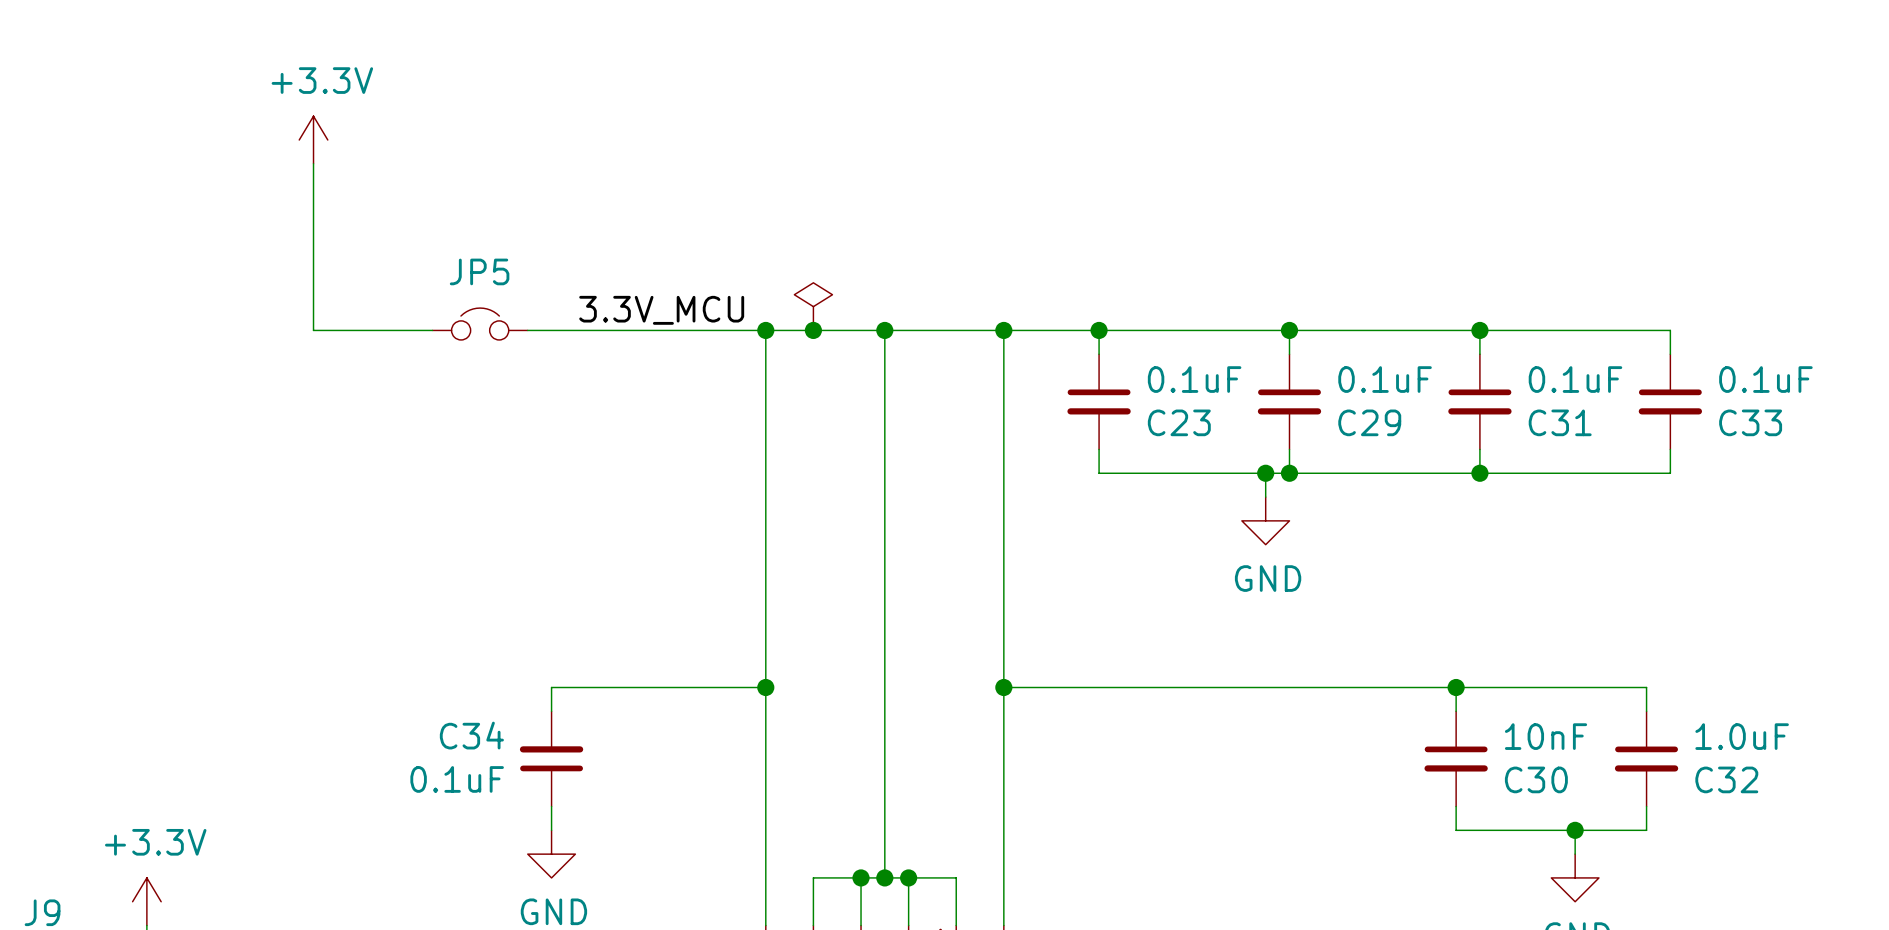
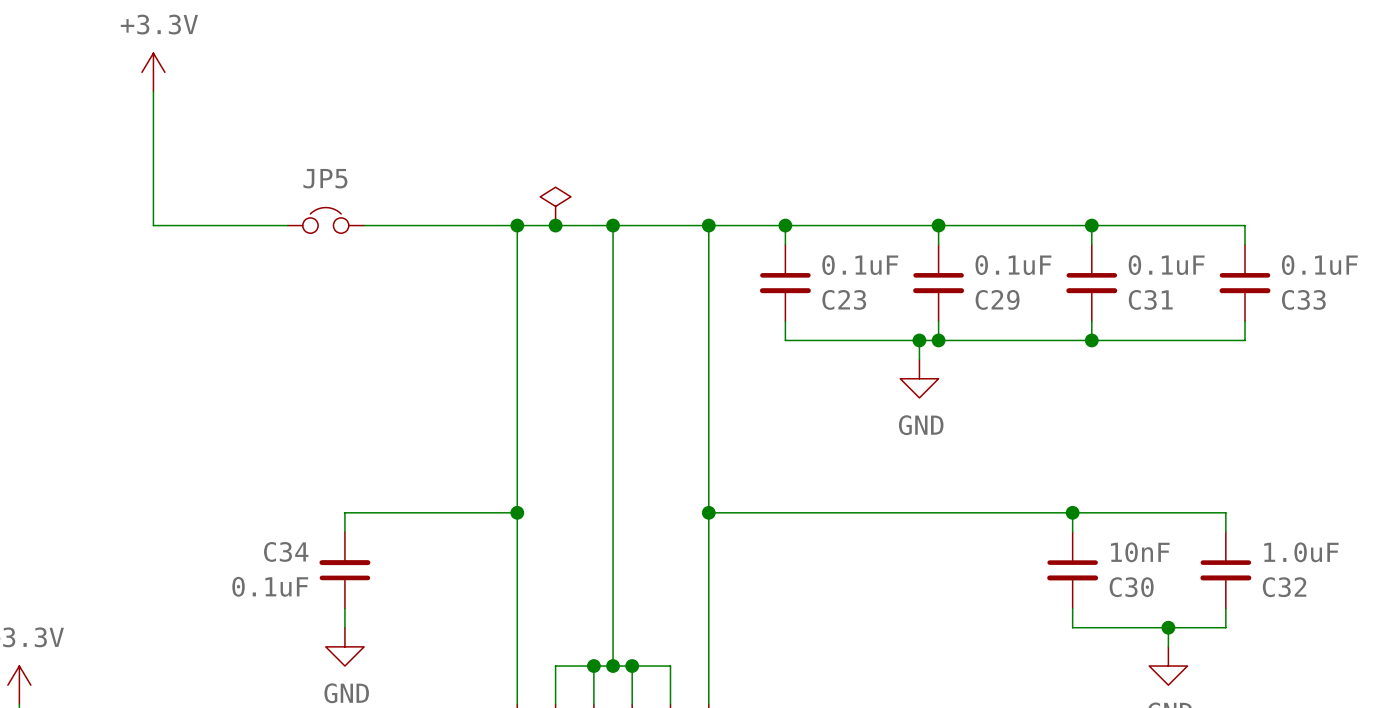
label: 3.3V_MCU (661, 310) -> none
JP5 position: (480, 324) -> (325, 220)
wire: (527, 330) (575, 330) -> (249, 225) (287, 225)

